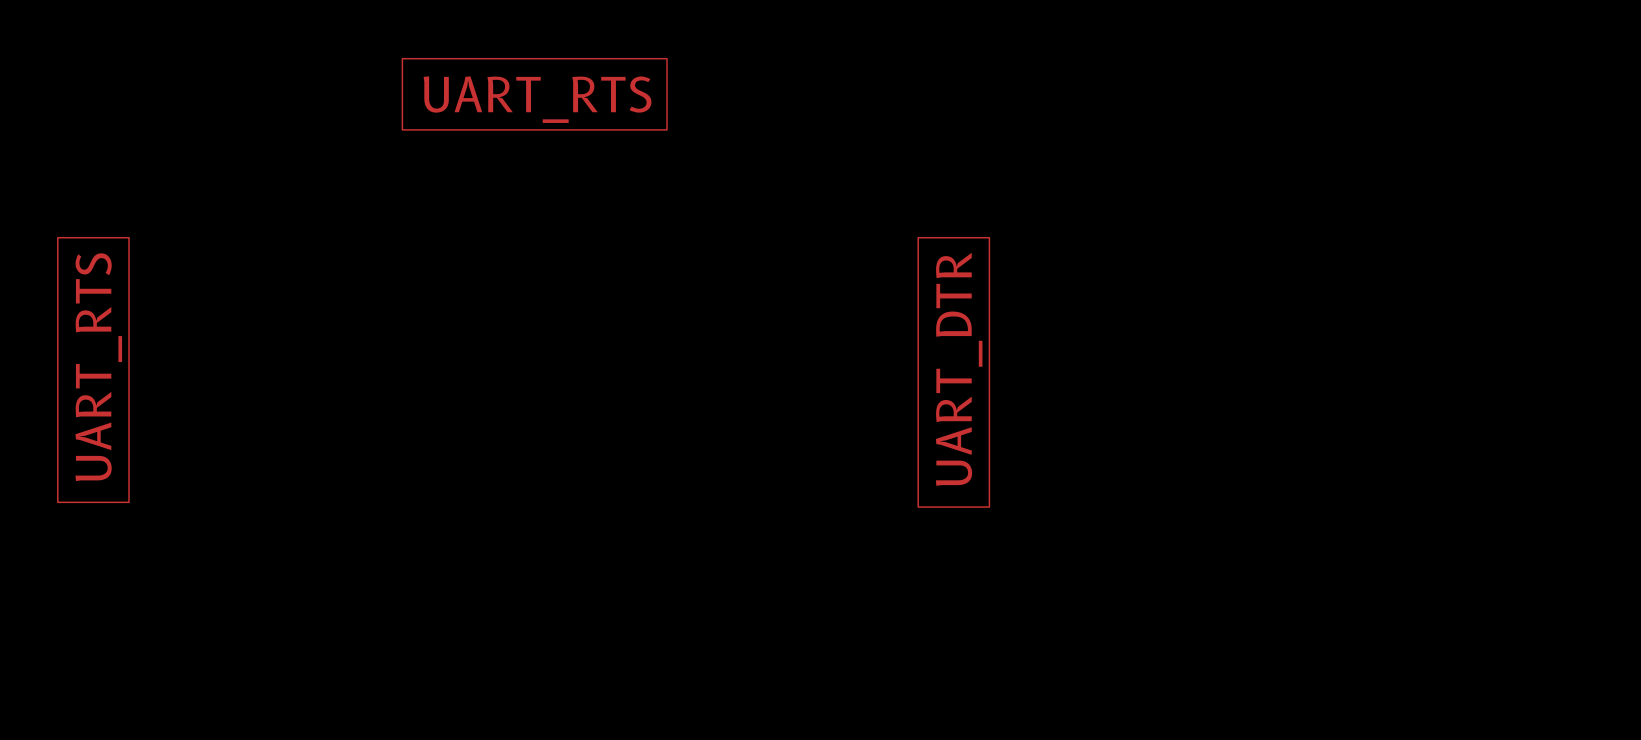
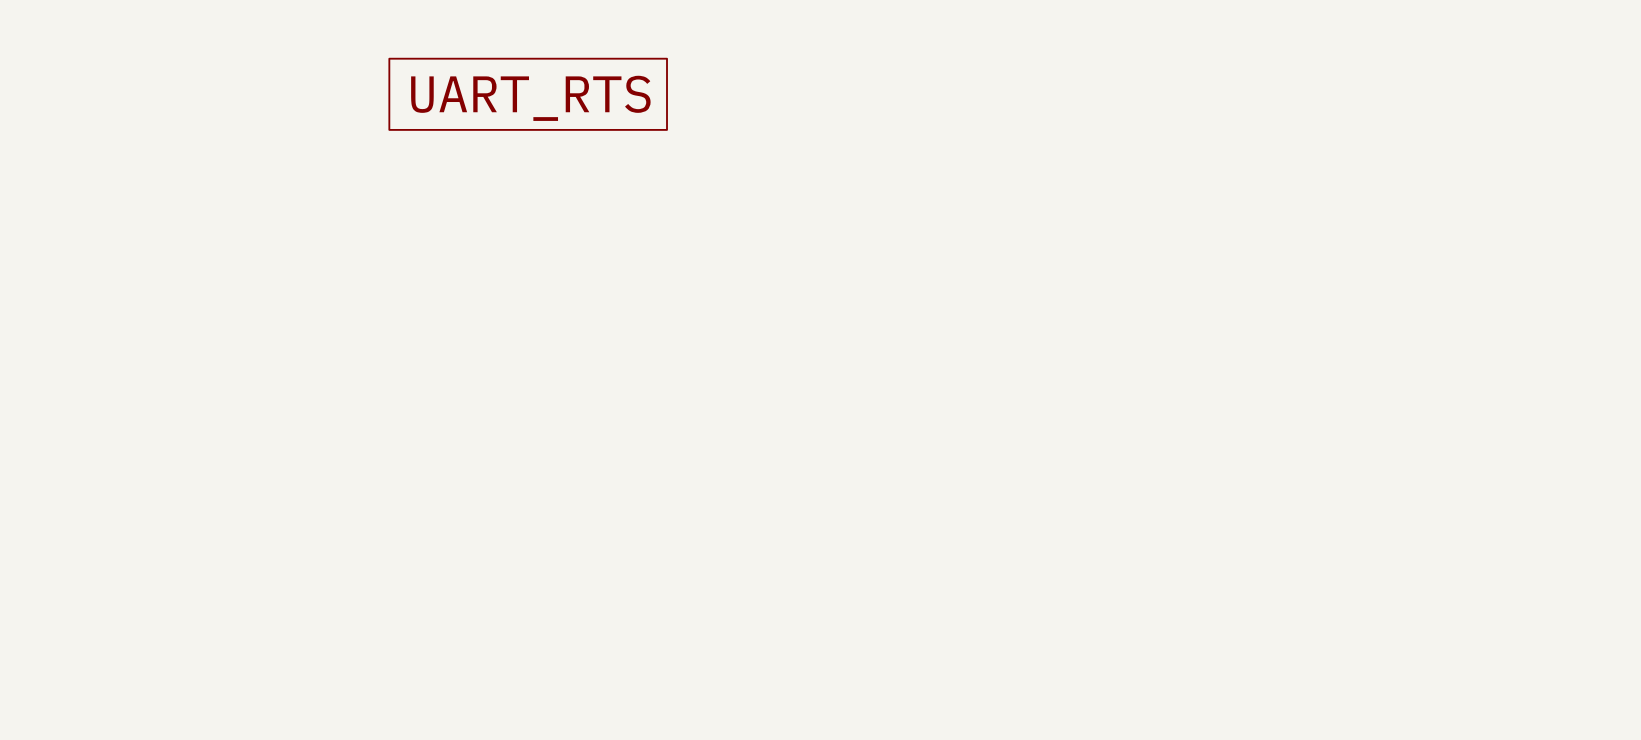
global label: UART_RTS (98, 367) -> none
global label: UART_DTR (959, 369) -> none

